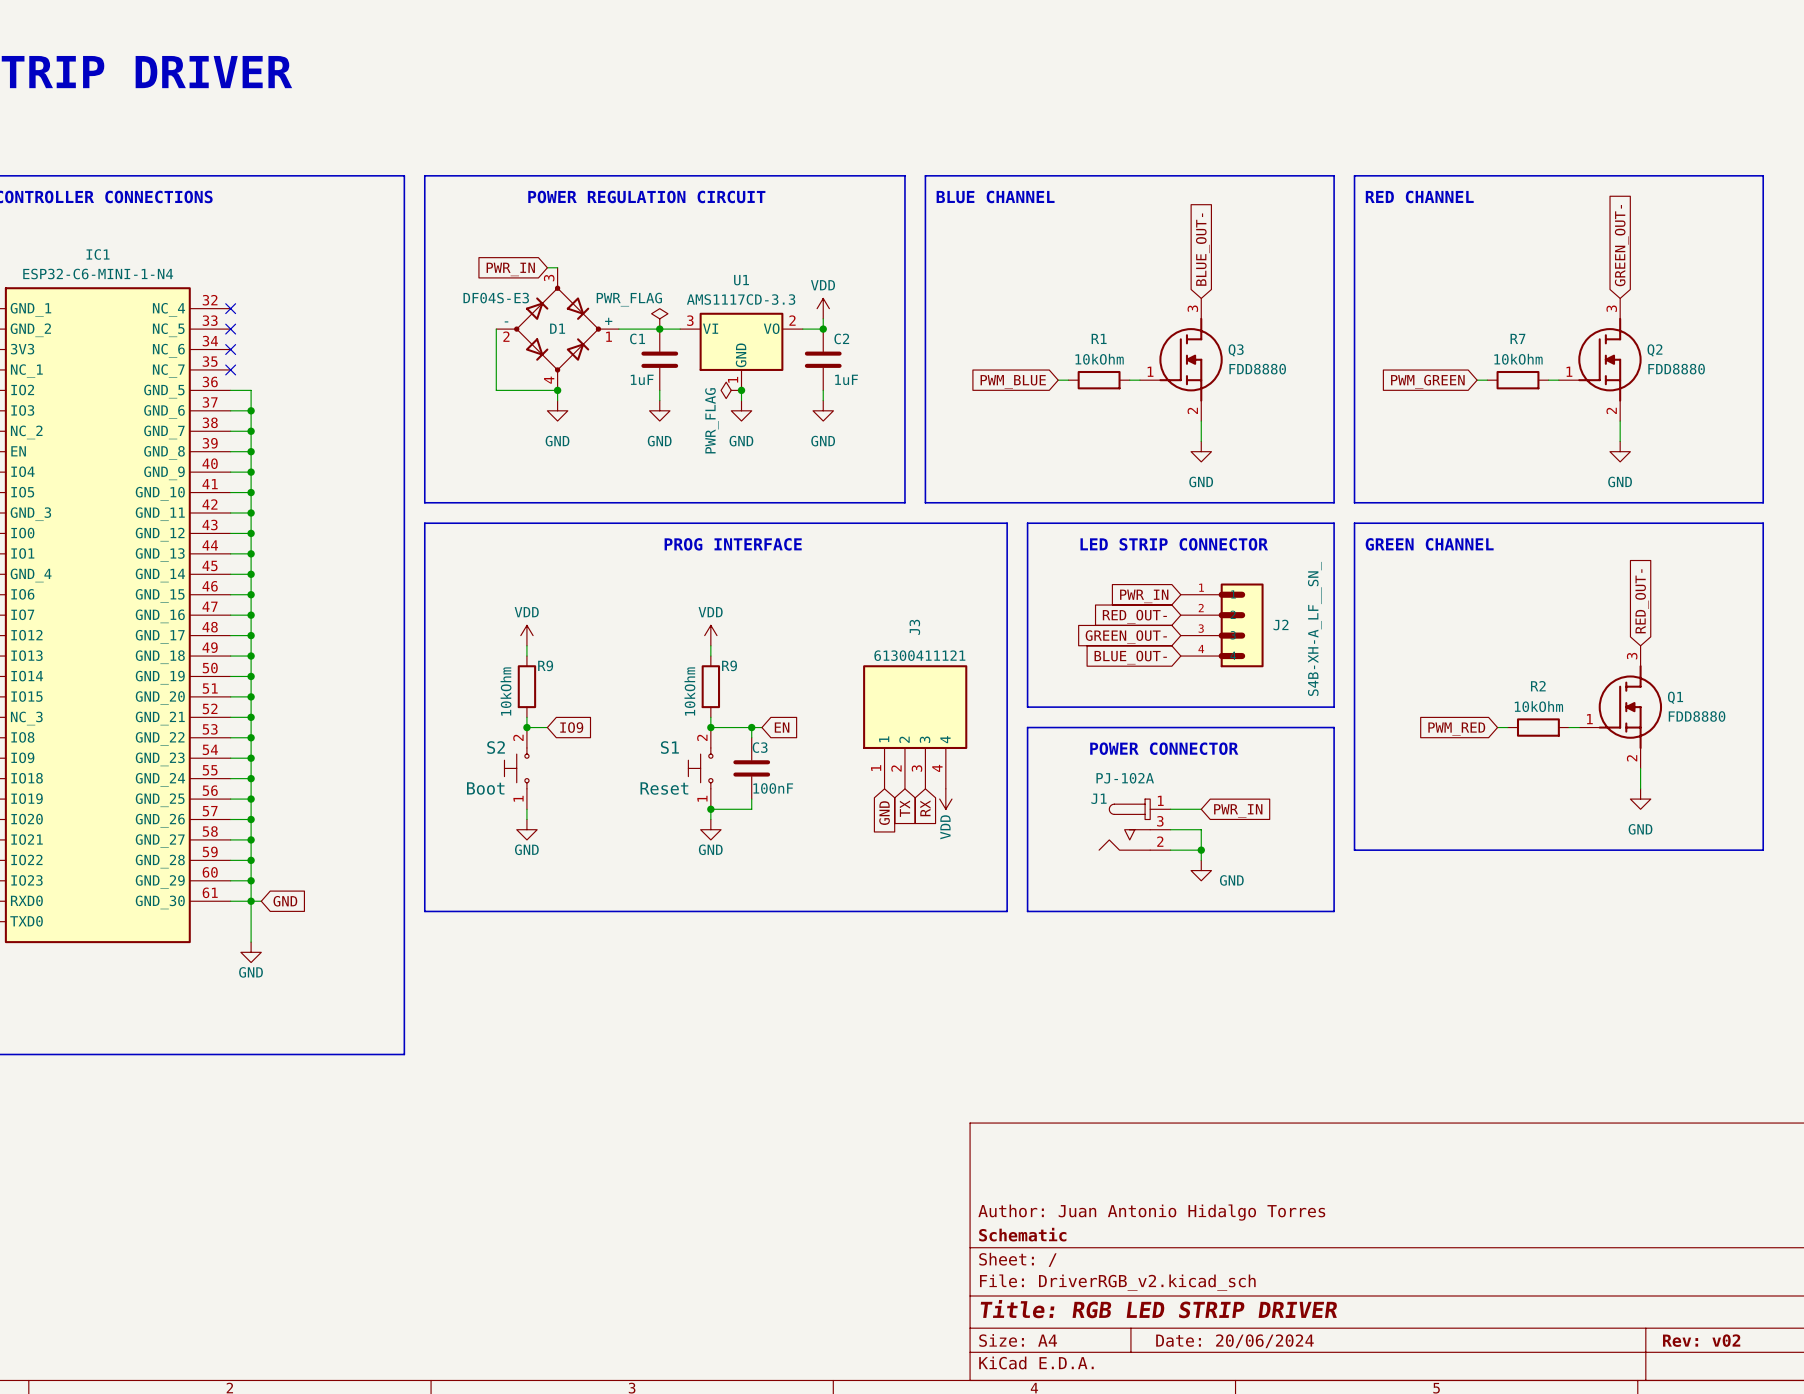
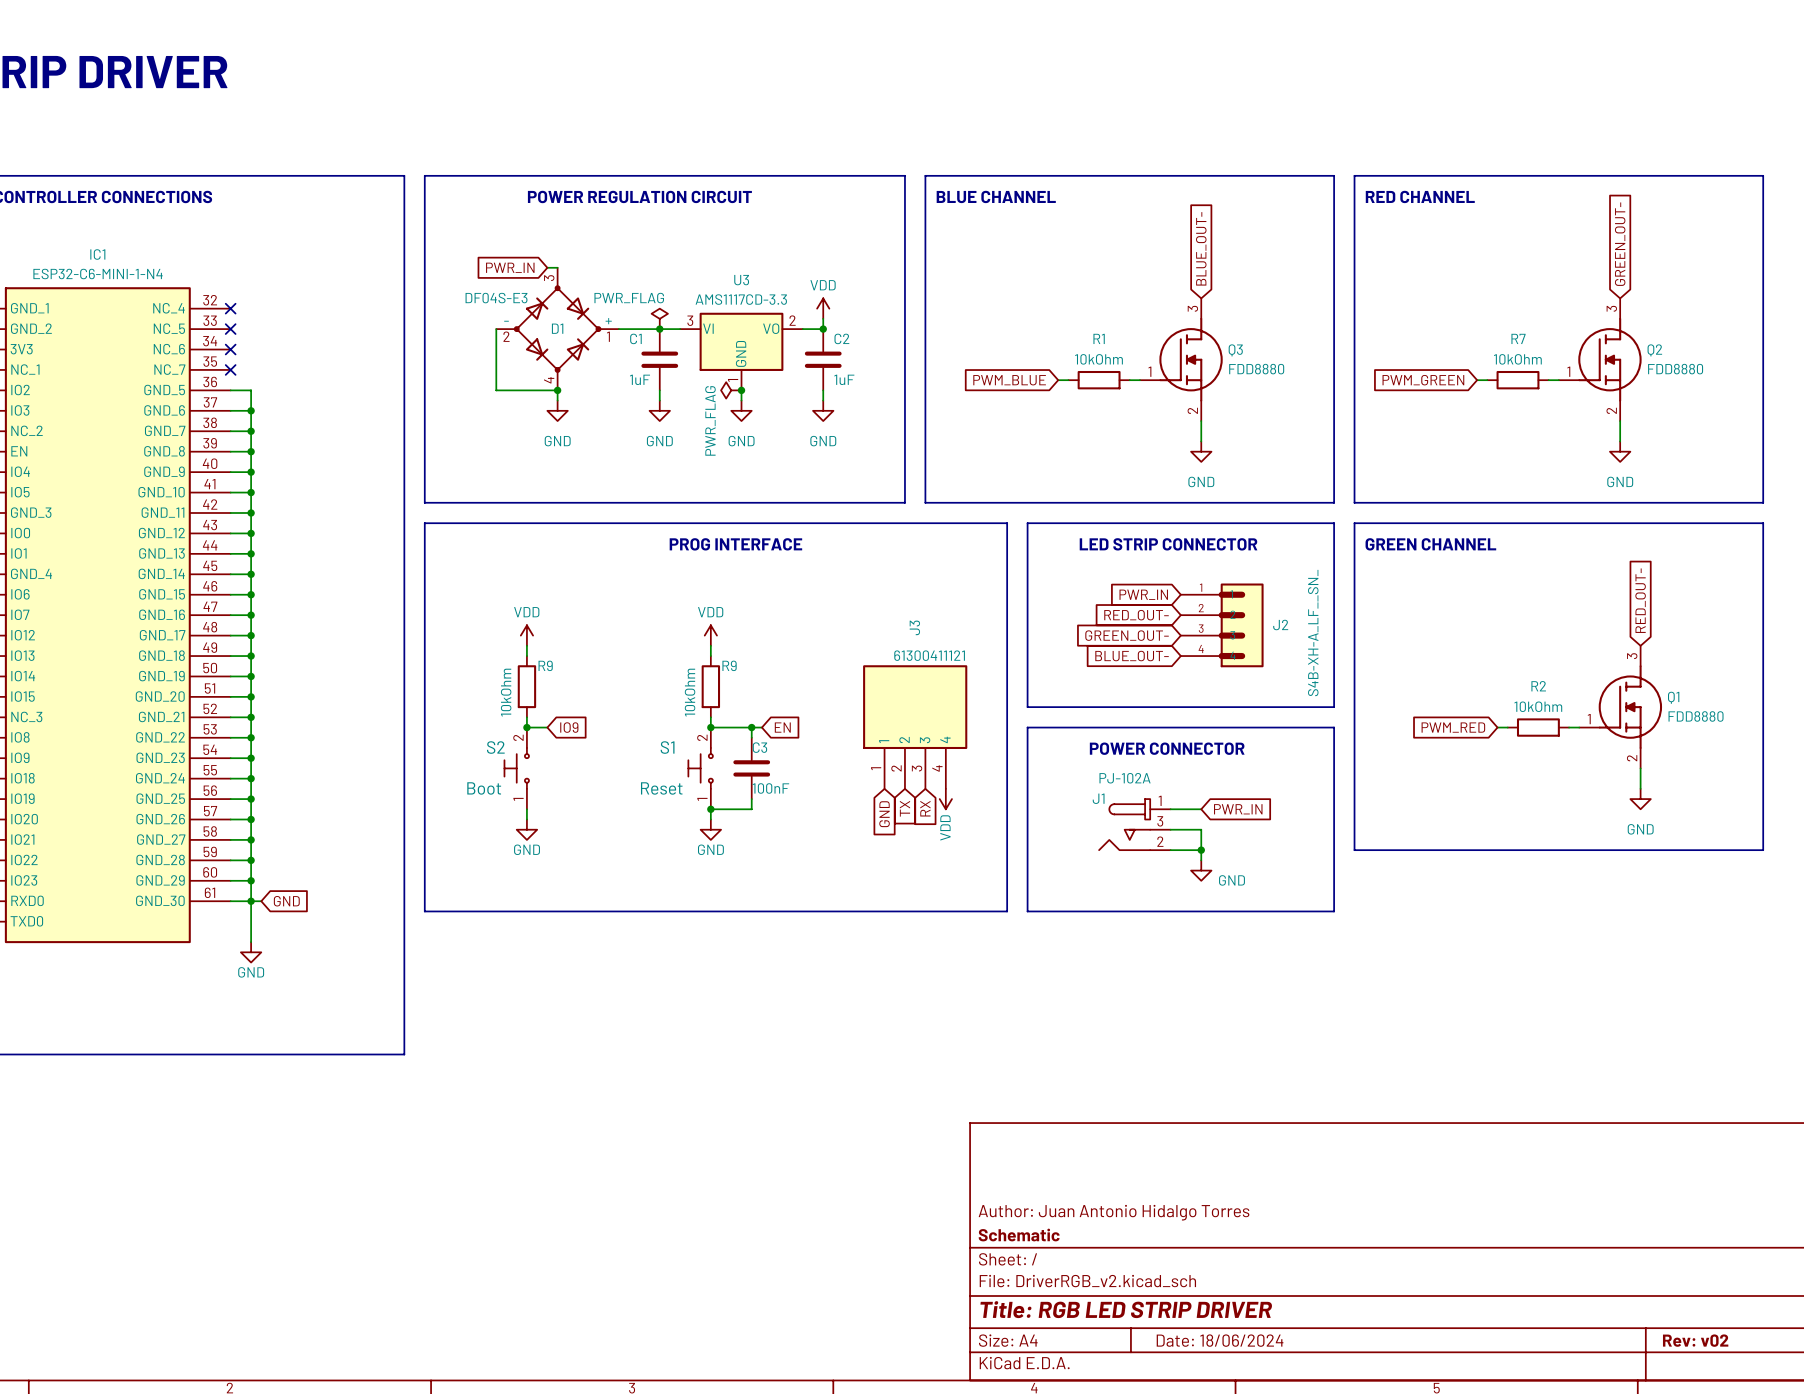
U1 name: U1 (741, 280) -> U3 (741, 280)
title block: Date: 20/06/2024 (1234, 1341) -> Date: 18/06/2024 (1220, 1340)

